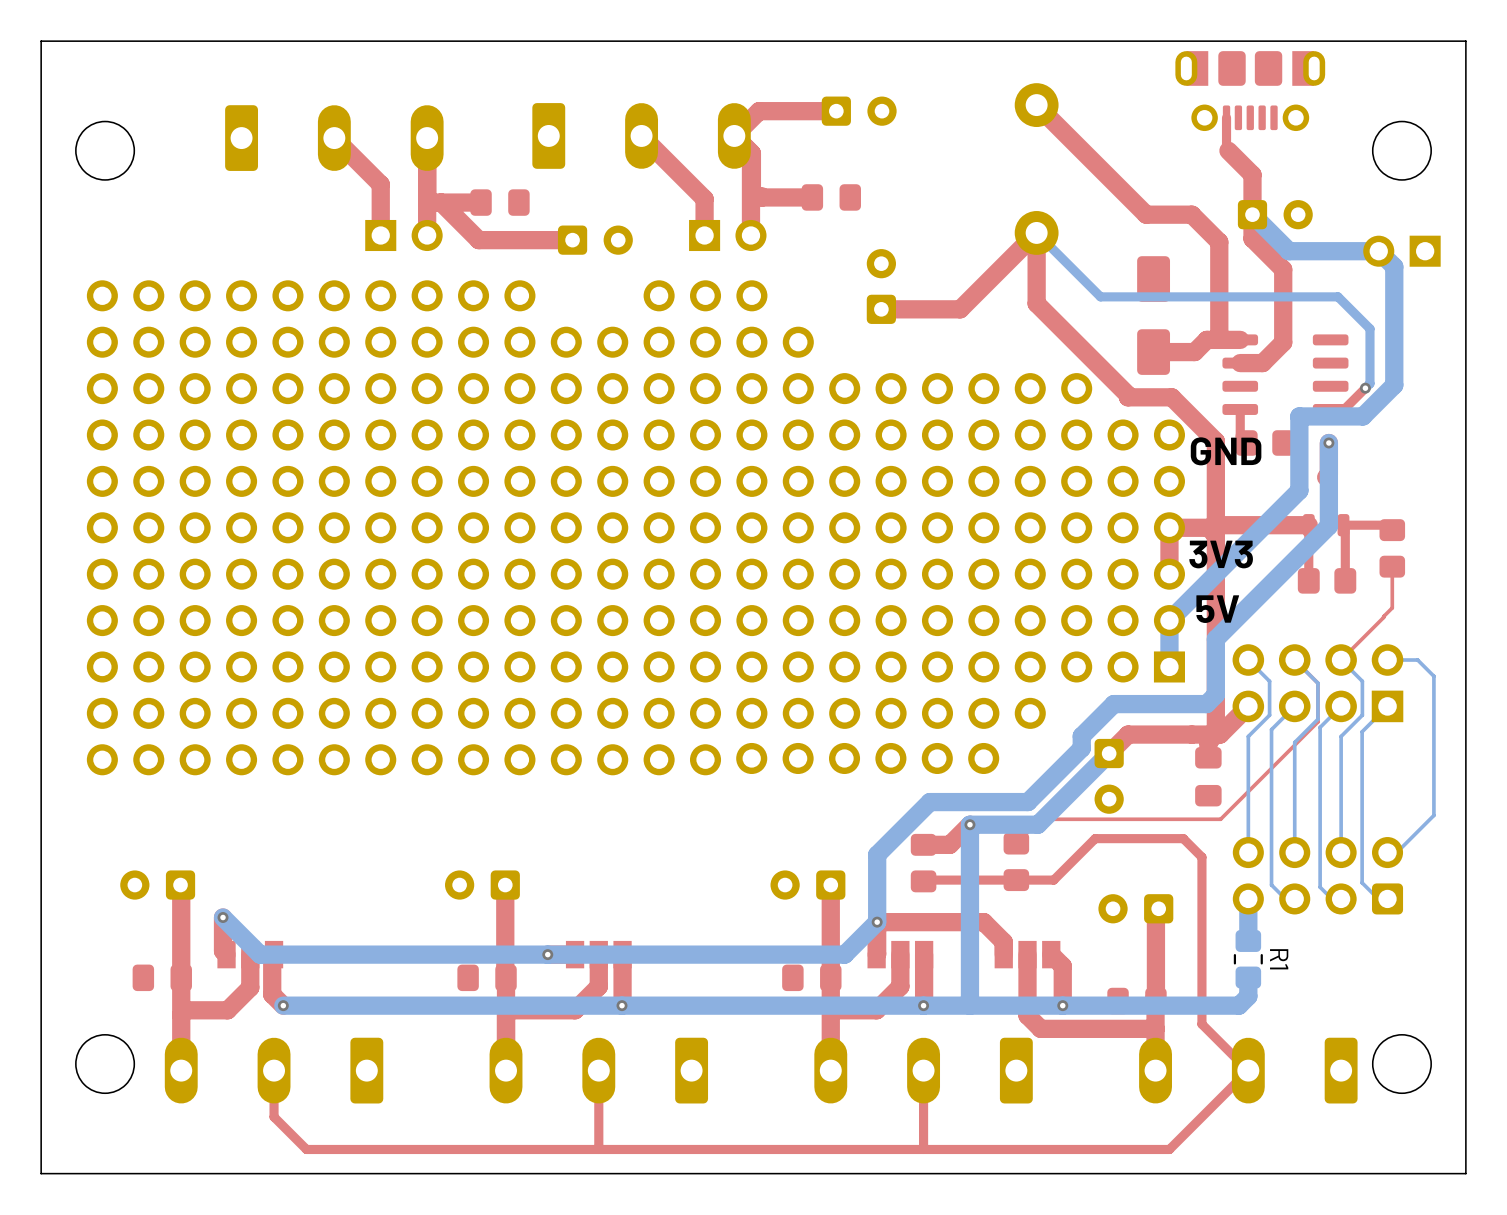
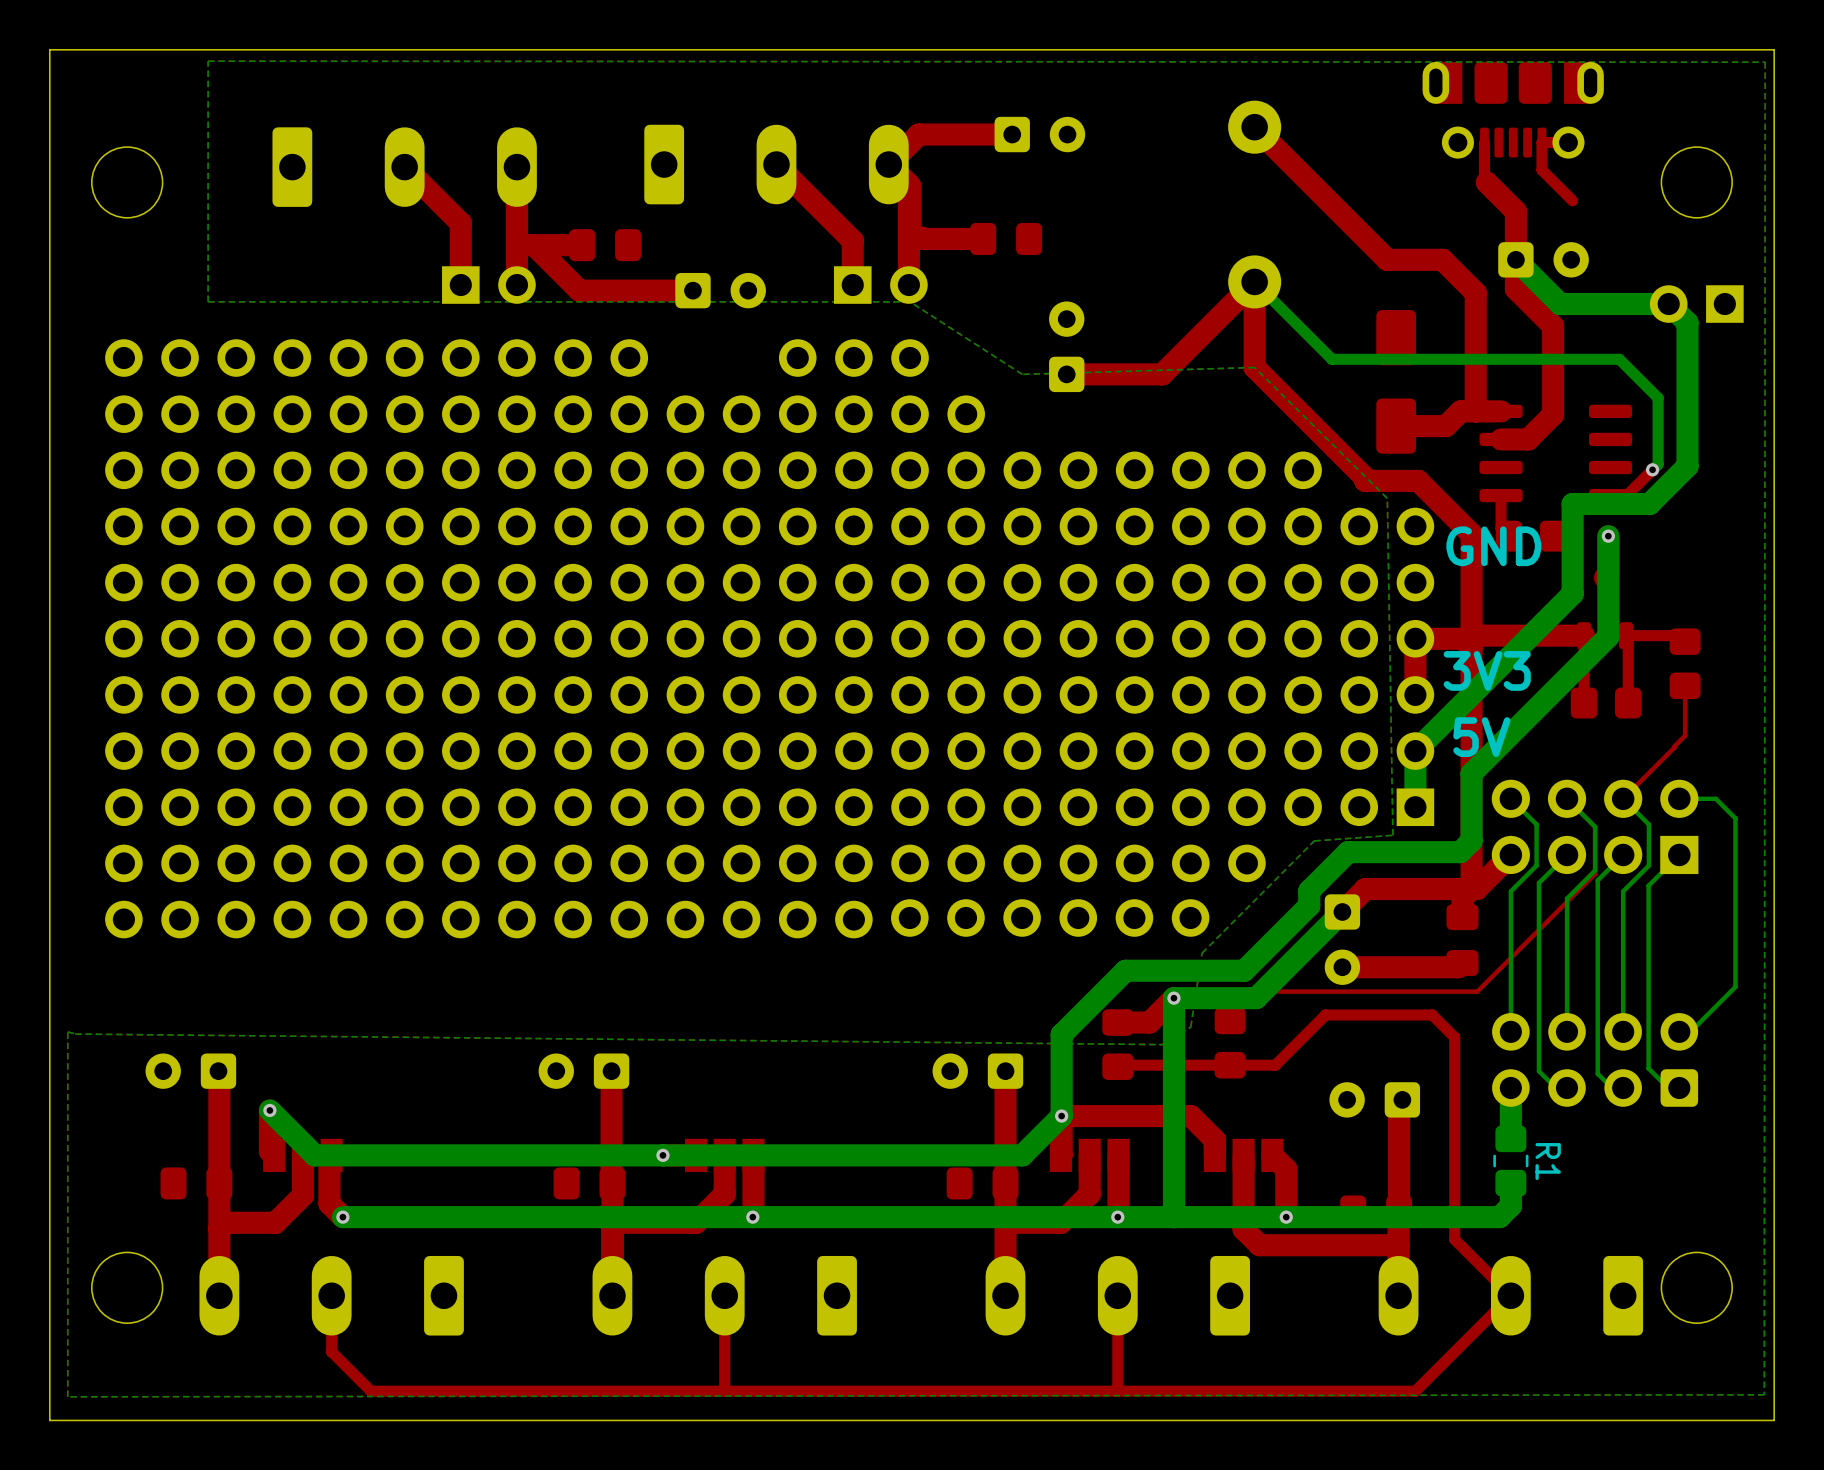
bottom zone outline: none -> (208, 61) (208, 301) (910, 301) (1022, 374) (1254, 367) (1387, 498) (1392, 835) (1314, 840) (1202, 953) (1190, 1027) (1162, 1044) (75, 1034) (67, 1031) (67, 1396) (1764, 1394) (1765, 62) (208, 61)
top track: none -> (1568, 142) (1541, 142) (1541, 170) (1572, 200)
top track: none -> (1462, 963) (1458, 967) (1342, 967)

